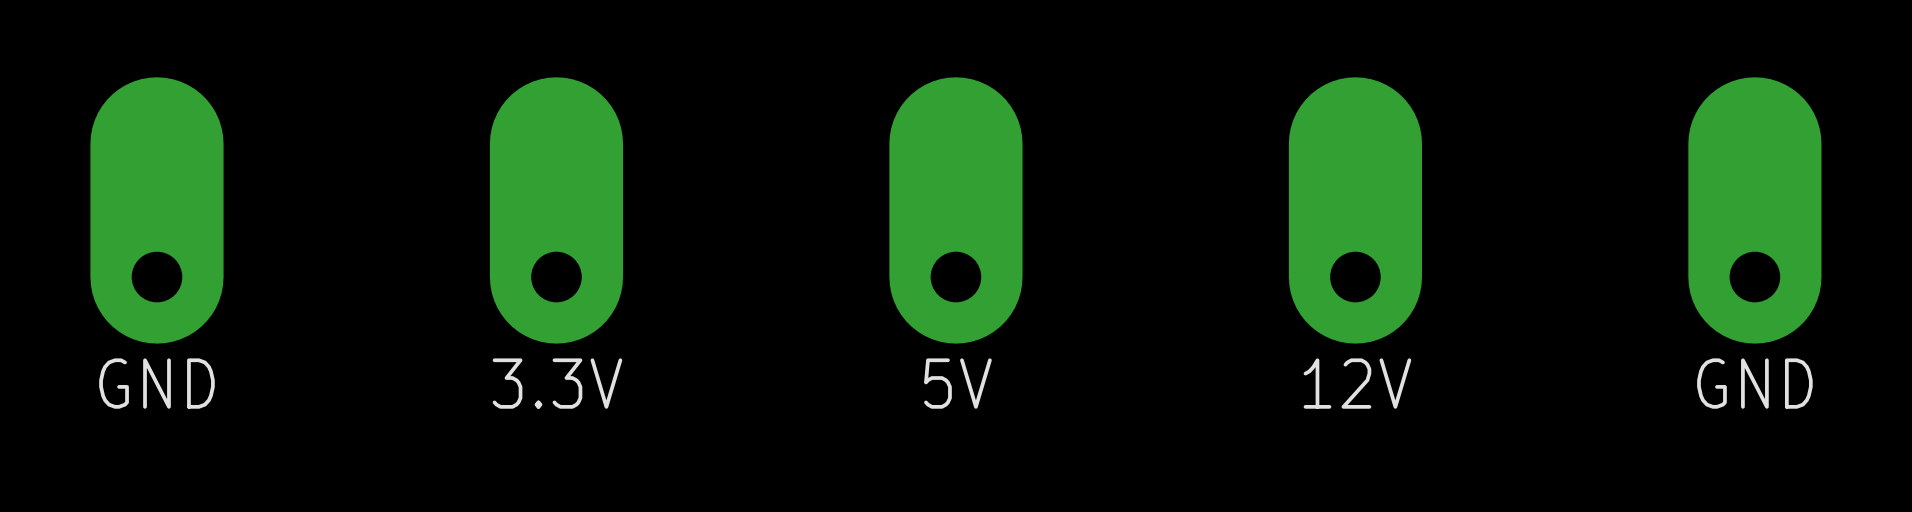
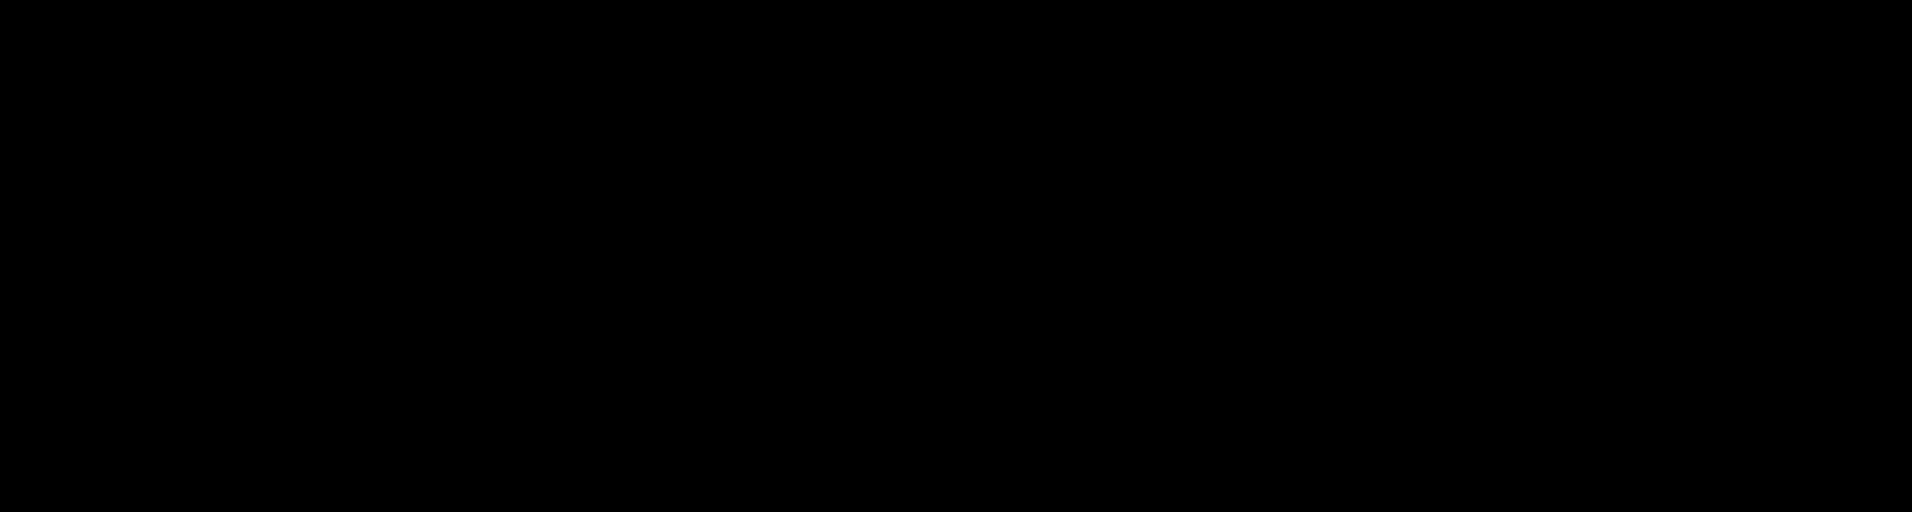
part: GND (156, 210) -> none
part: 3.3V (556, 210) -> none
part: 5V (955, 210) -> none
part: 12V (1355, 210) -> none
part: GND (1754, 210) -> none

